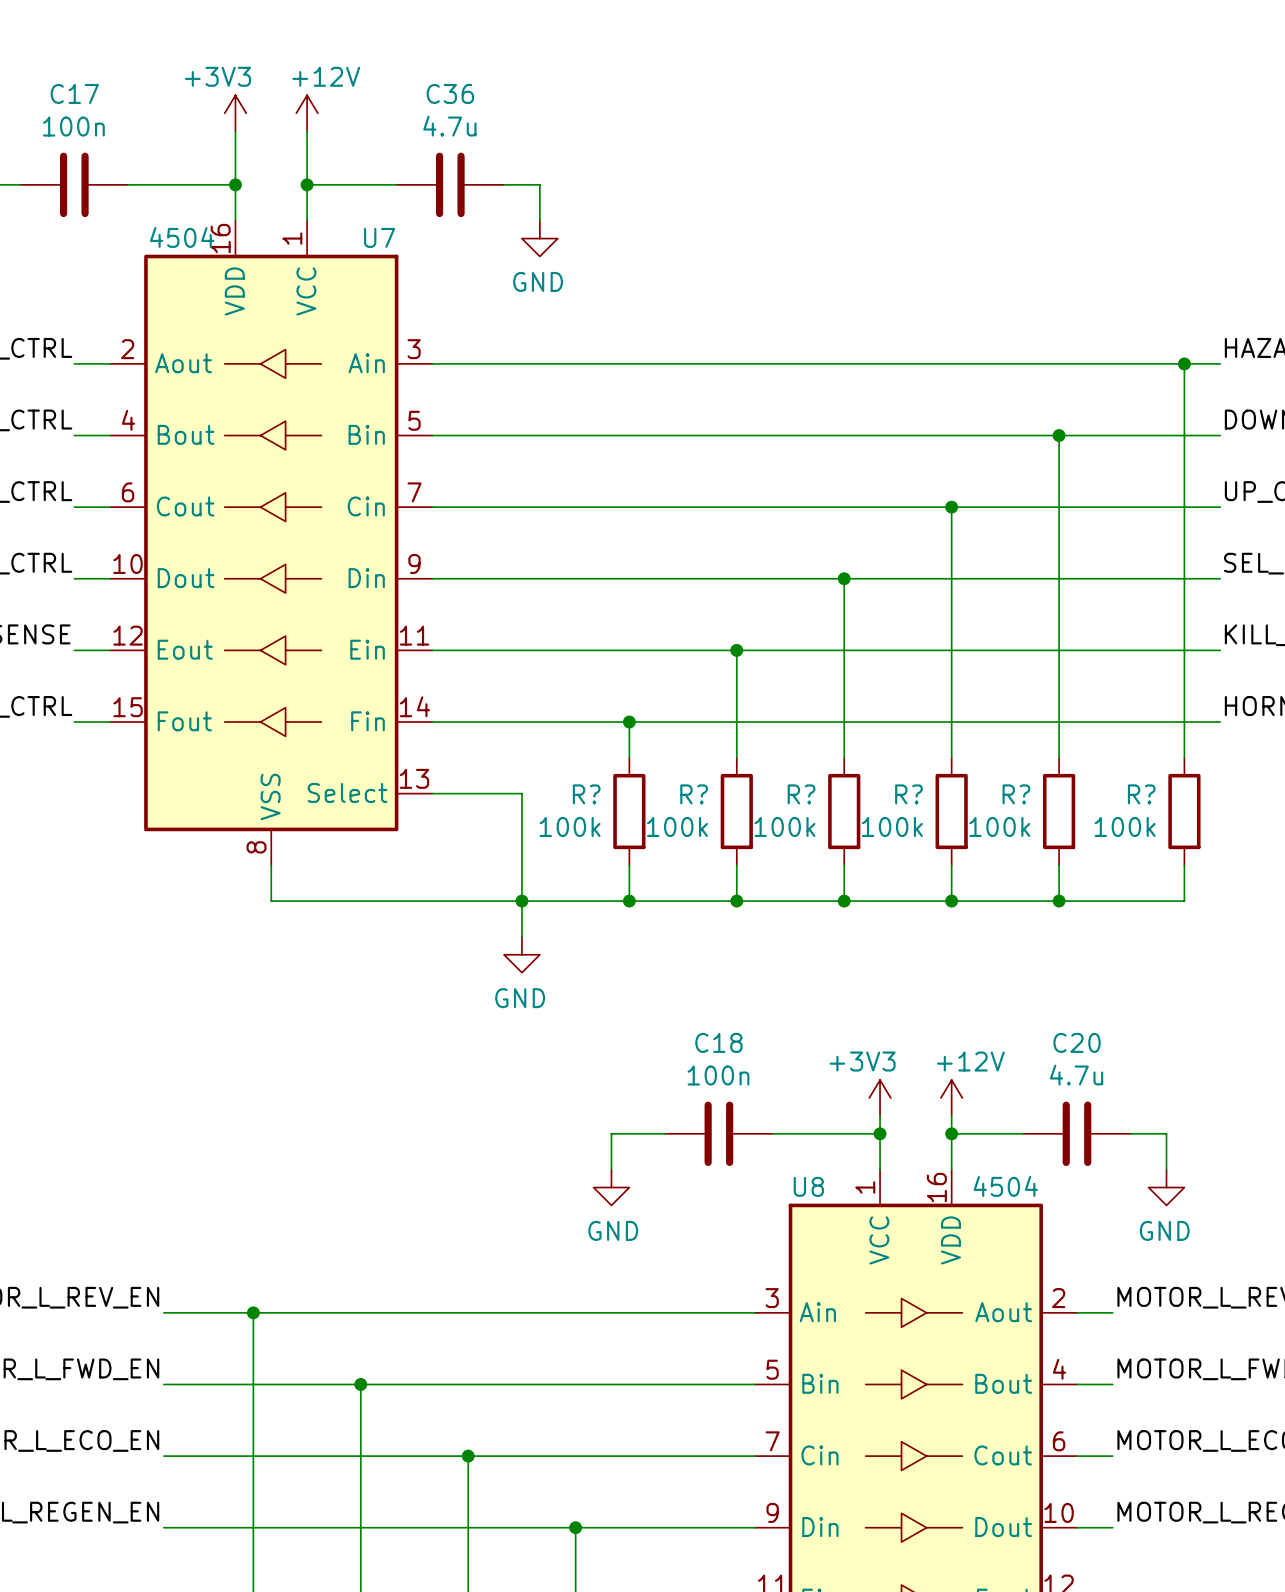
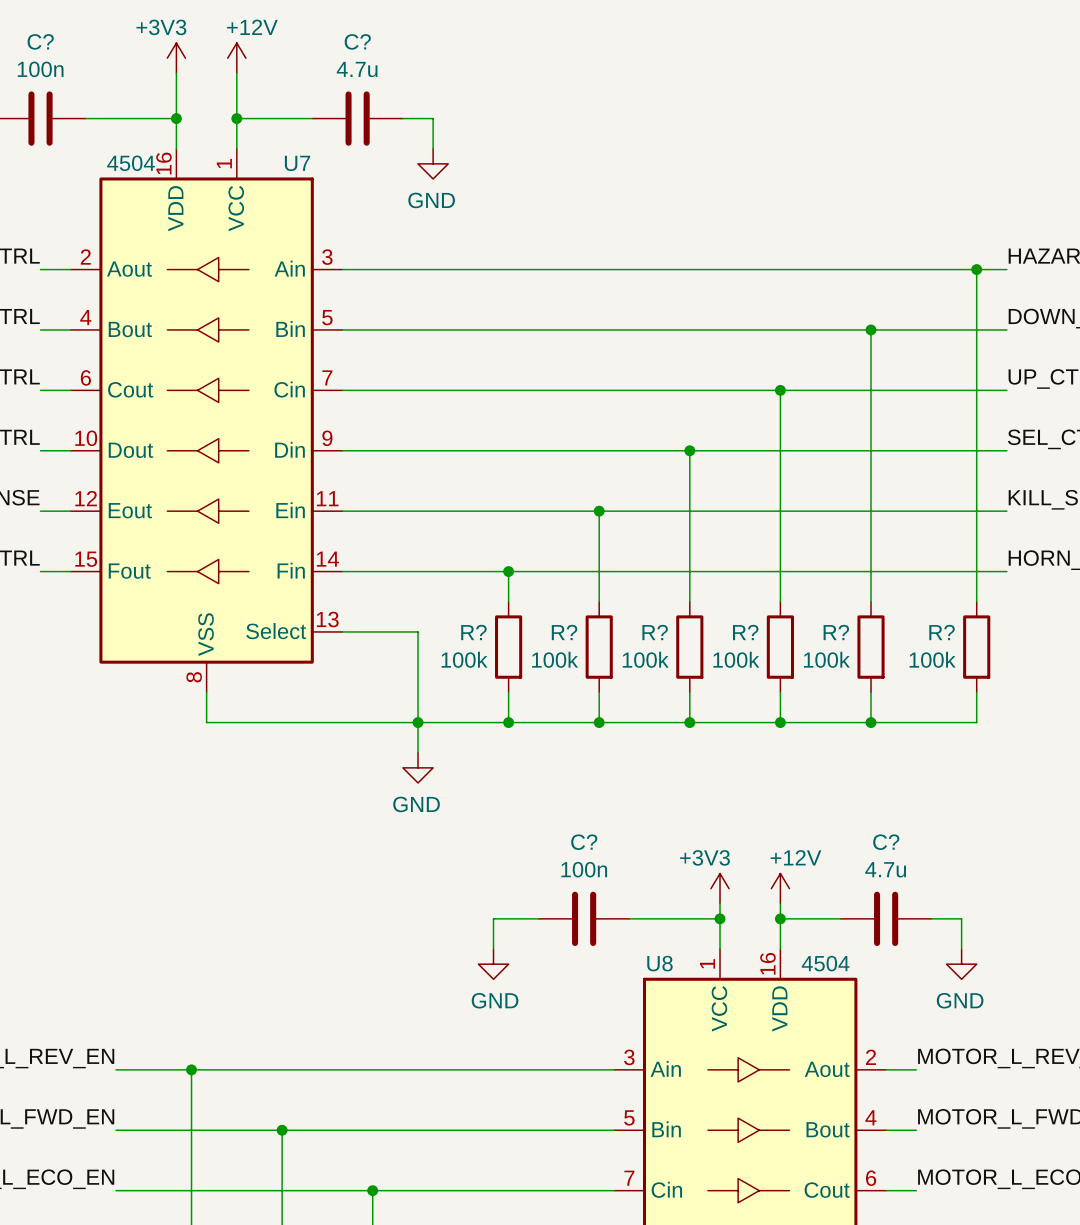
C17 name: C17 (74, 93) -> C? (40, 41)
C36 name: C36 (450, 93) -> C? (357, 41)
C18 name: C18 (718, 1042) -> C? (584, 842)
C20 name: C20 (1076, 1042) -> C? (886, 842)

